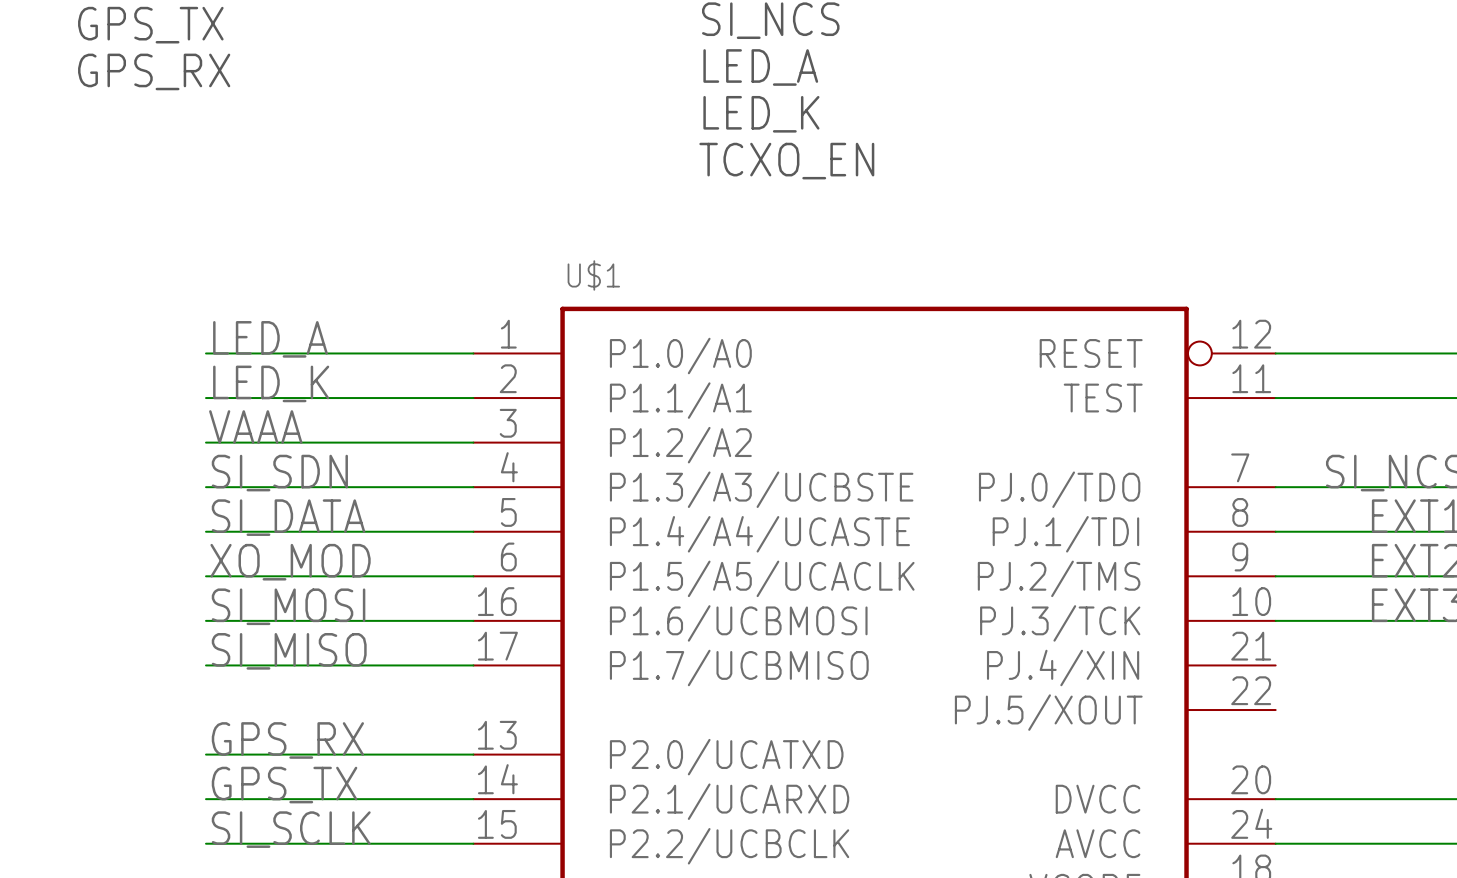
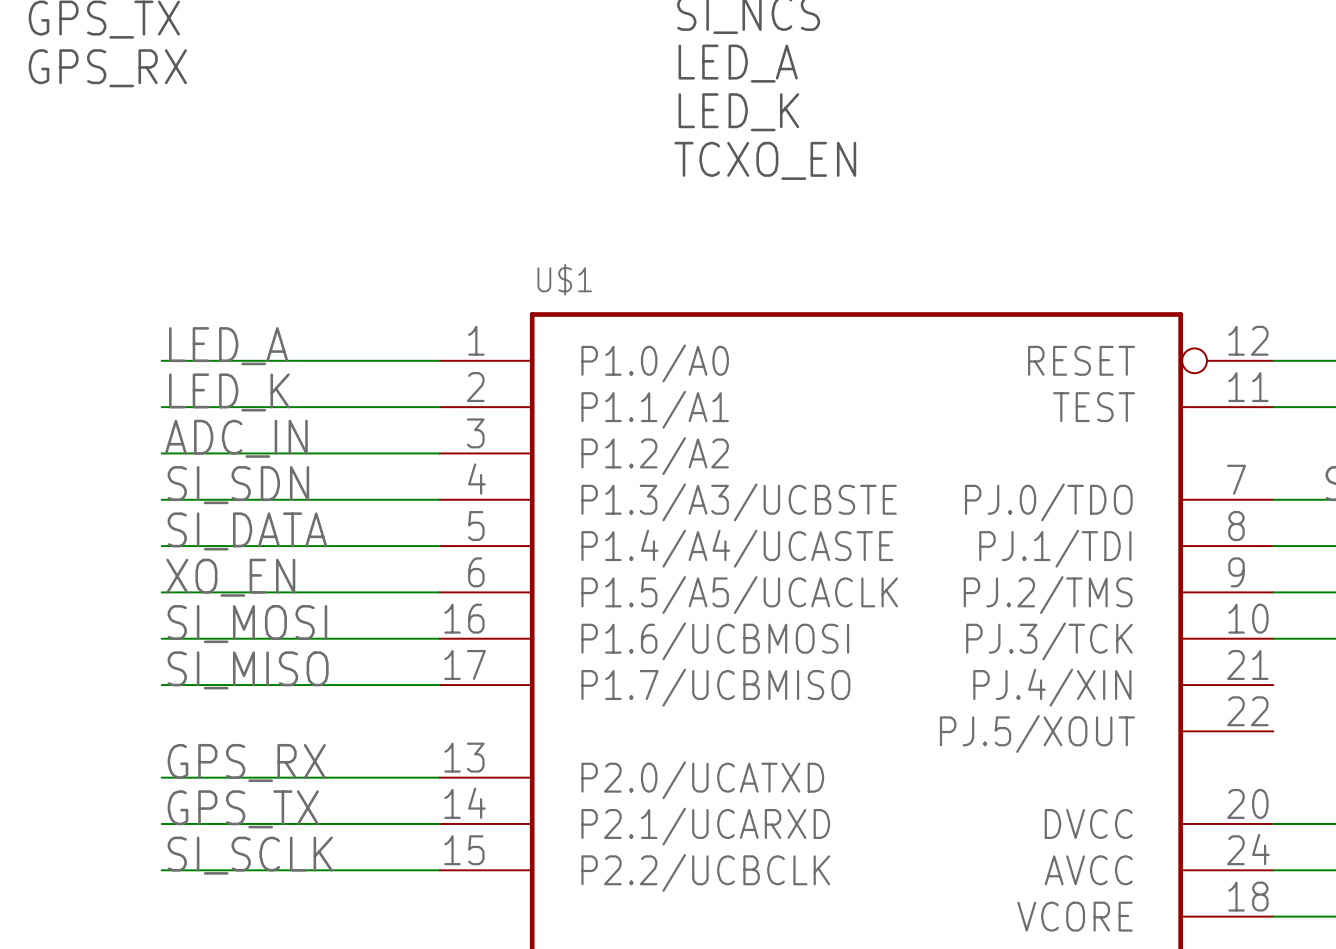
label: VAAA (255, 427) -> ADC_IN (236, 438)
label: XO_MOD (290, 562) -> XO_EN (230, 577)

